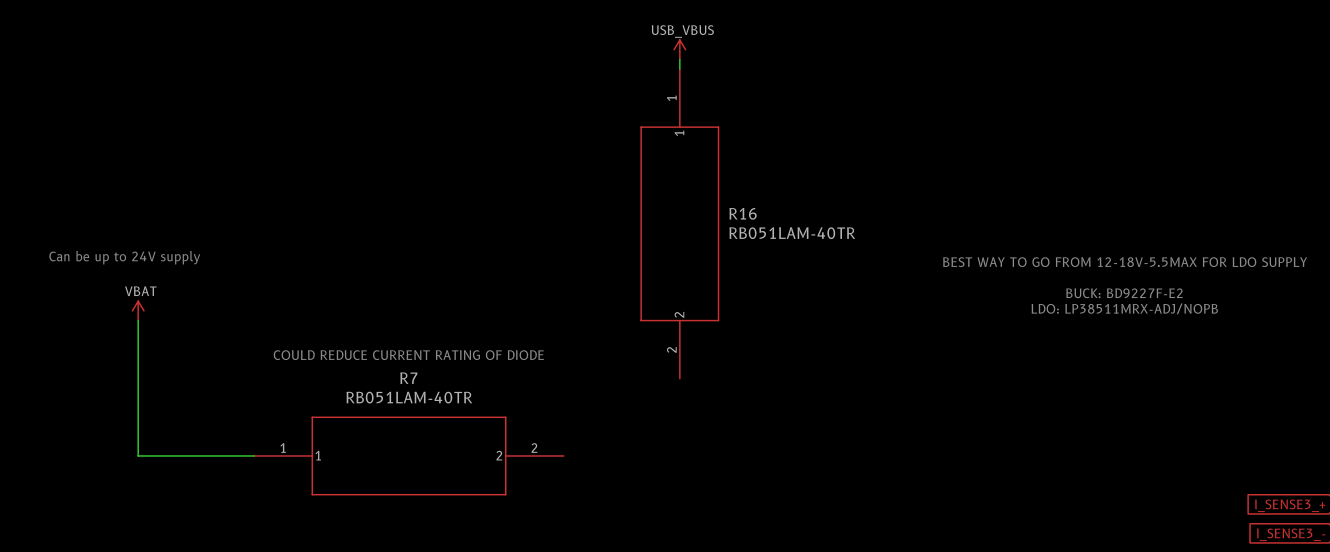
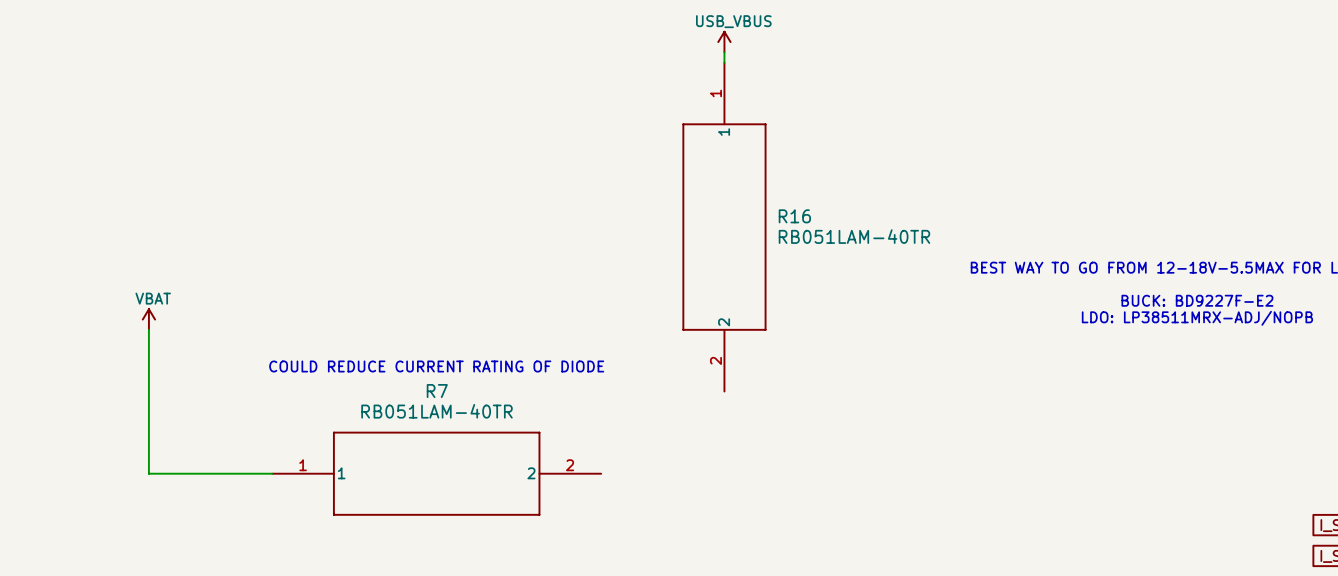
text: Can be up to 24V supply (124, 257) -> none

